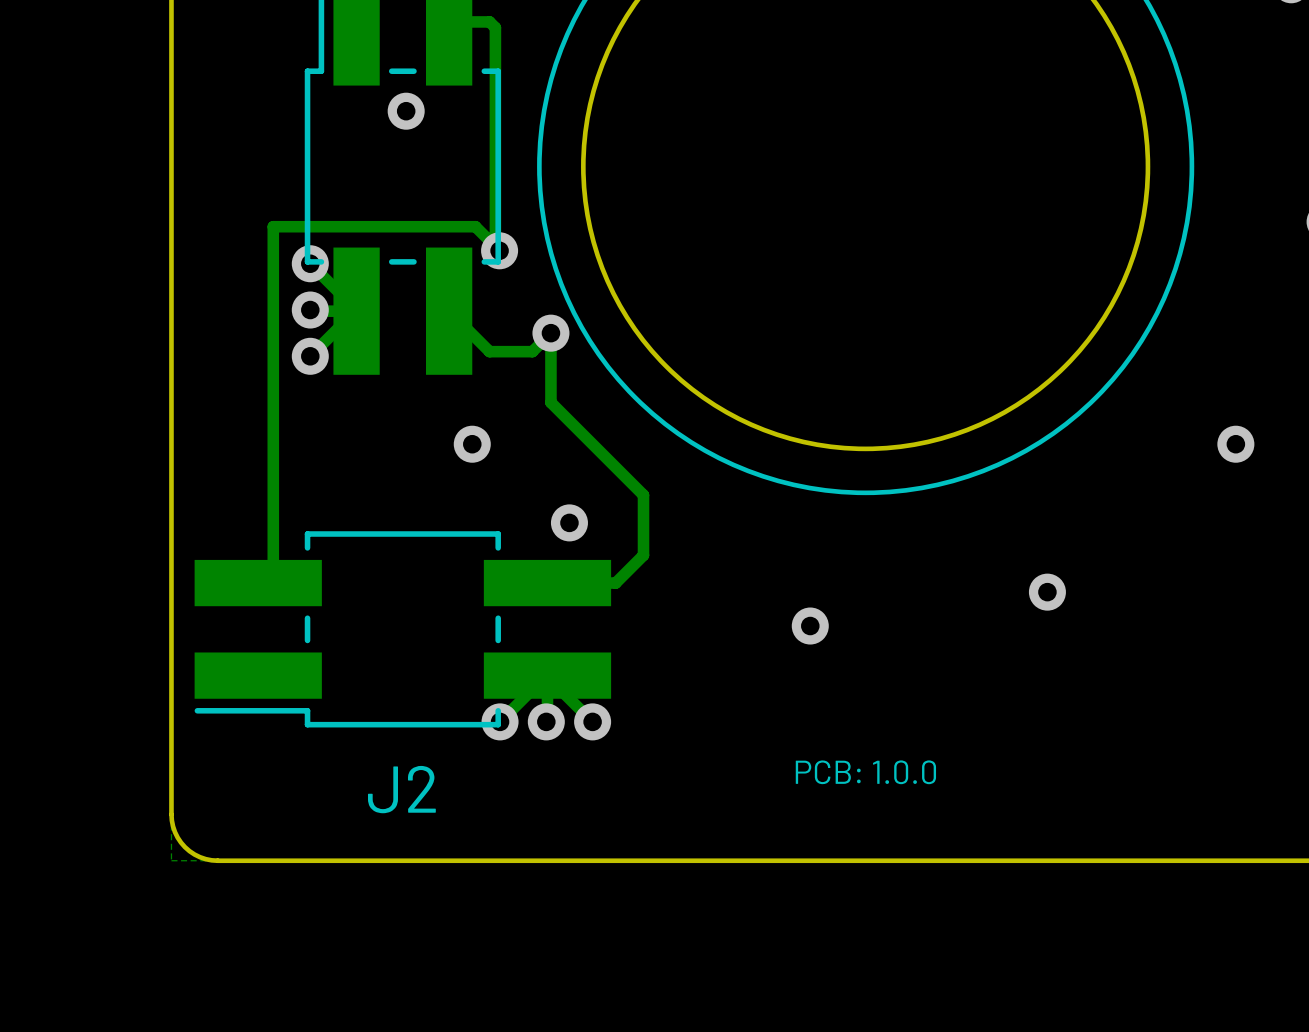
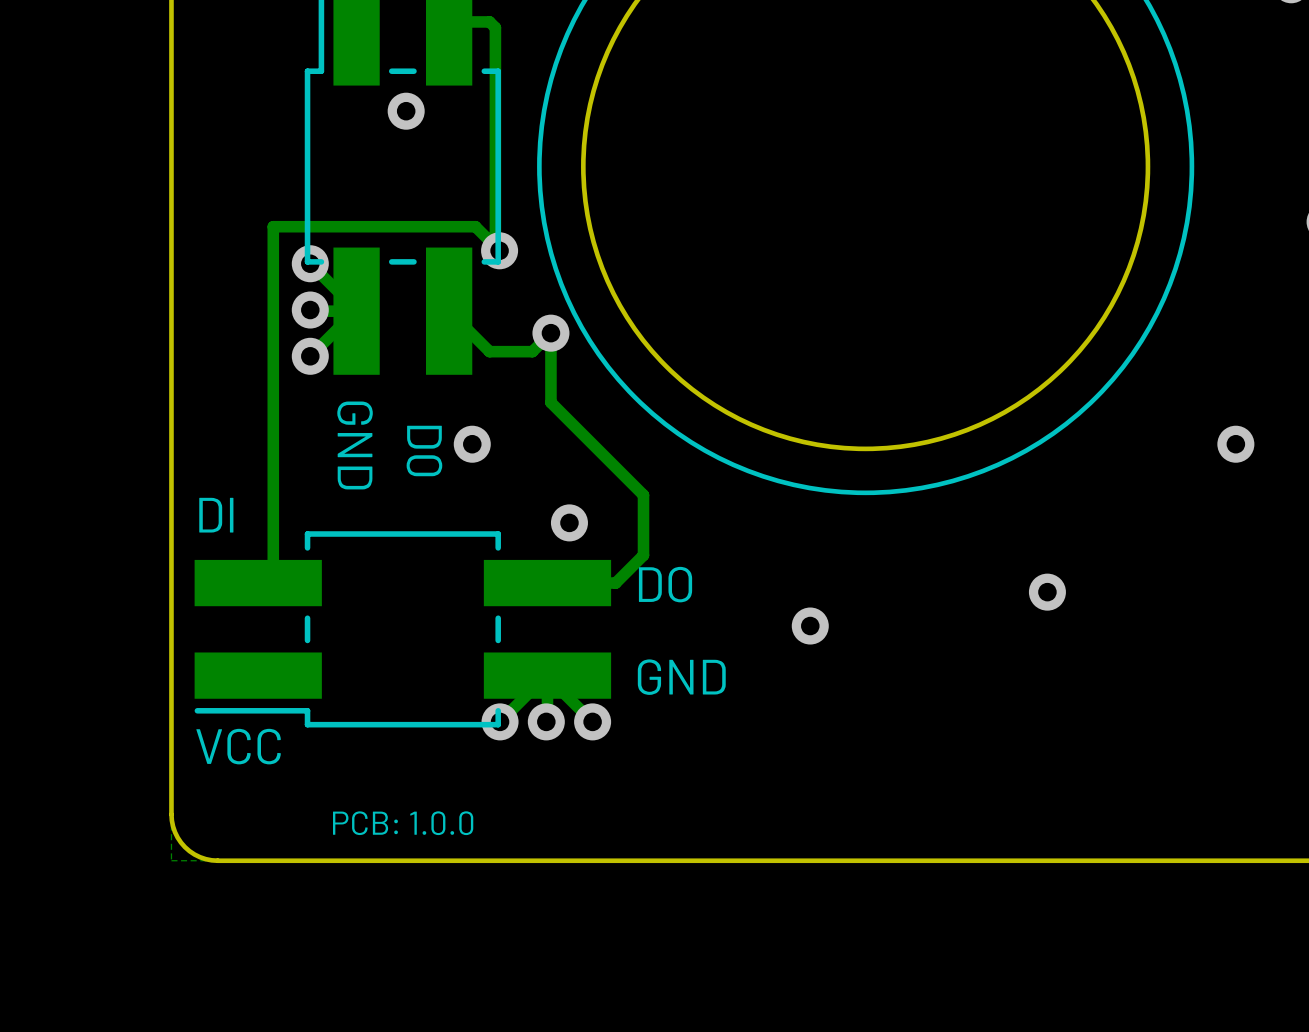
text: none -> GND (355, 445)
text: none -> D0 (424, 450)
text: none -> DI (216, 515)
text: none -> DO (665, 584)
text: none -> GND (681, 677)
text: none -> VCC (238, 746)
text position: PCB: 1.0.0 (865, 772) -> PCB: 1.0.0 (403, 823)
J2 name: J2 (401, 789) -> none

